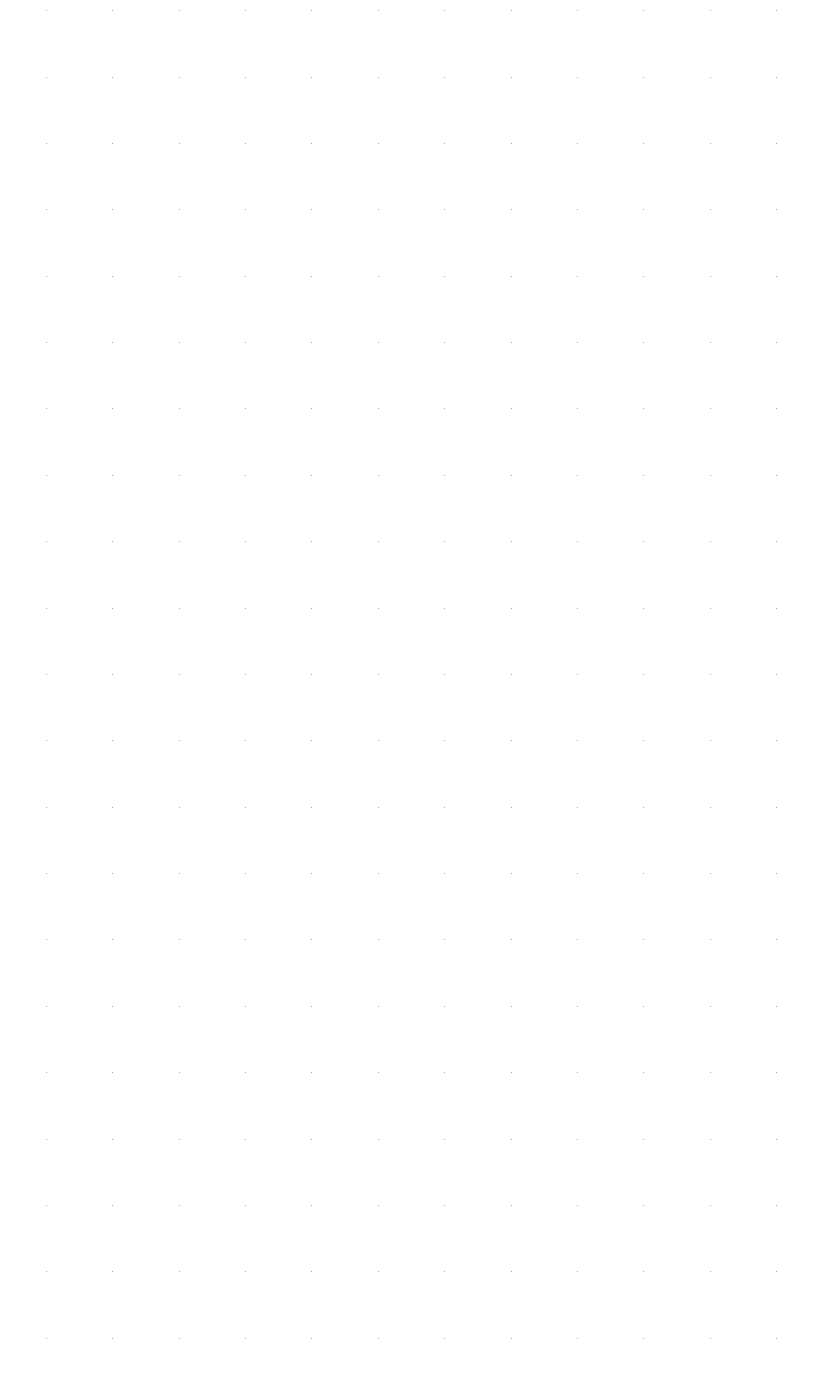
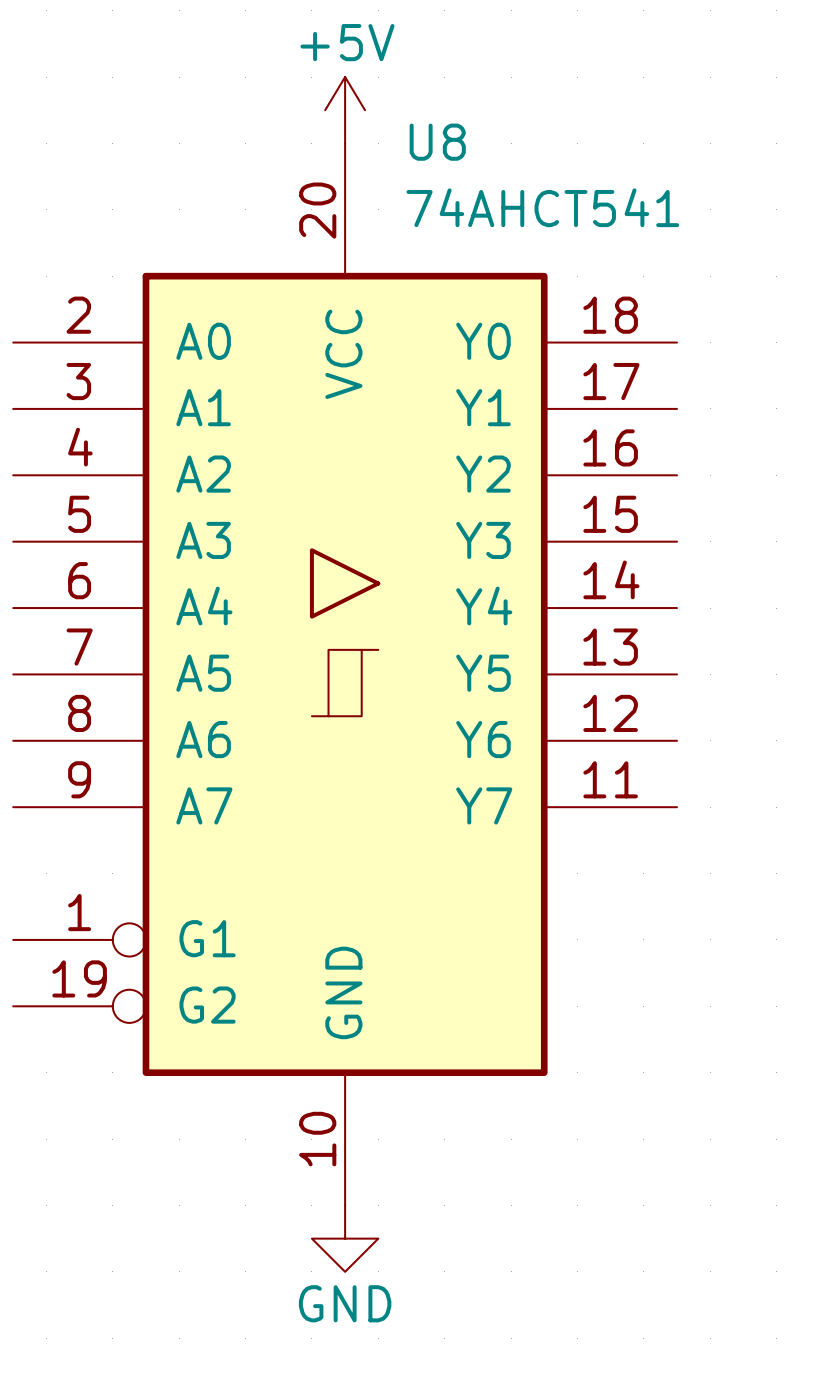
power symbol: none -> +5V (345, 110)
U8: none -> 74AHCT541 (345, 674)
power symbol: none -> GND (345, 1238)

